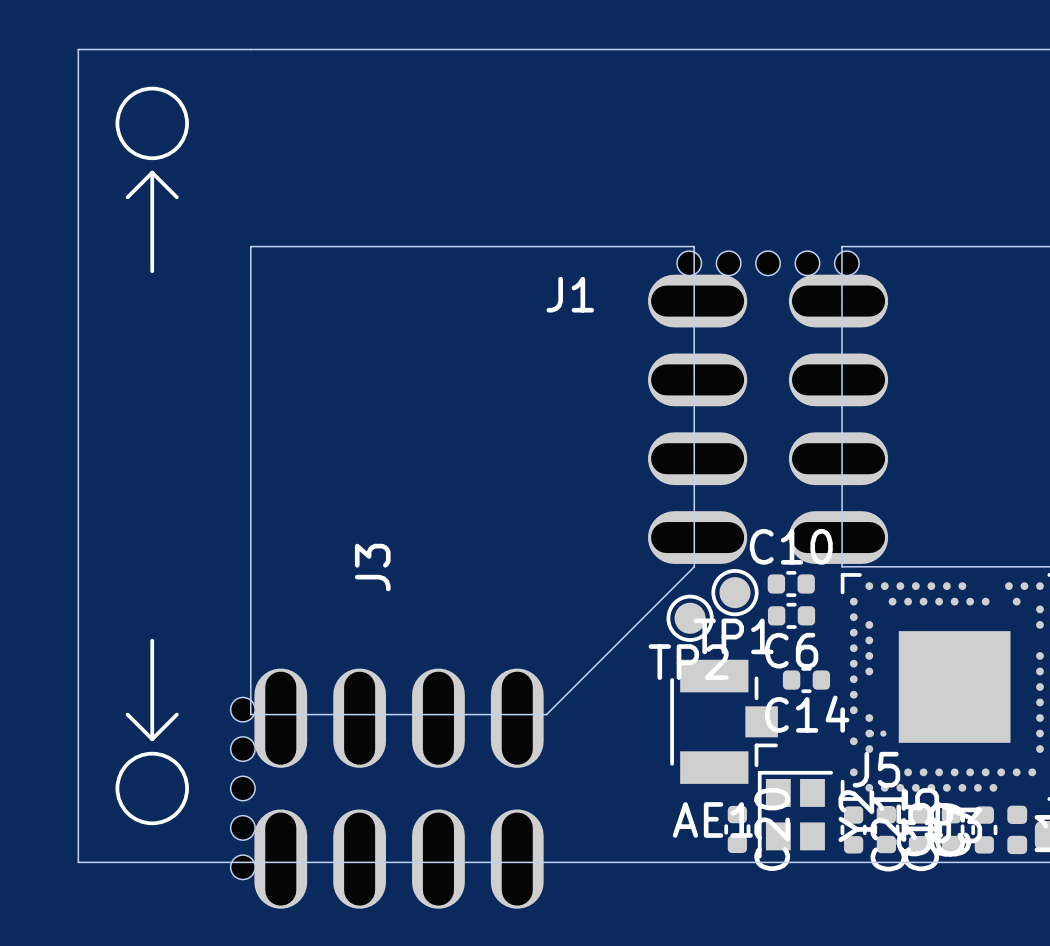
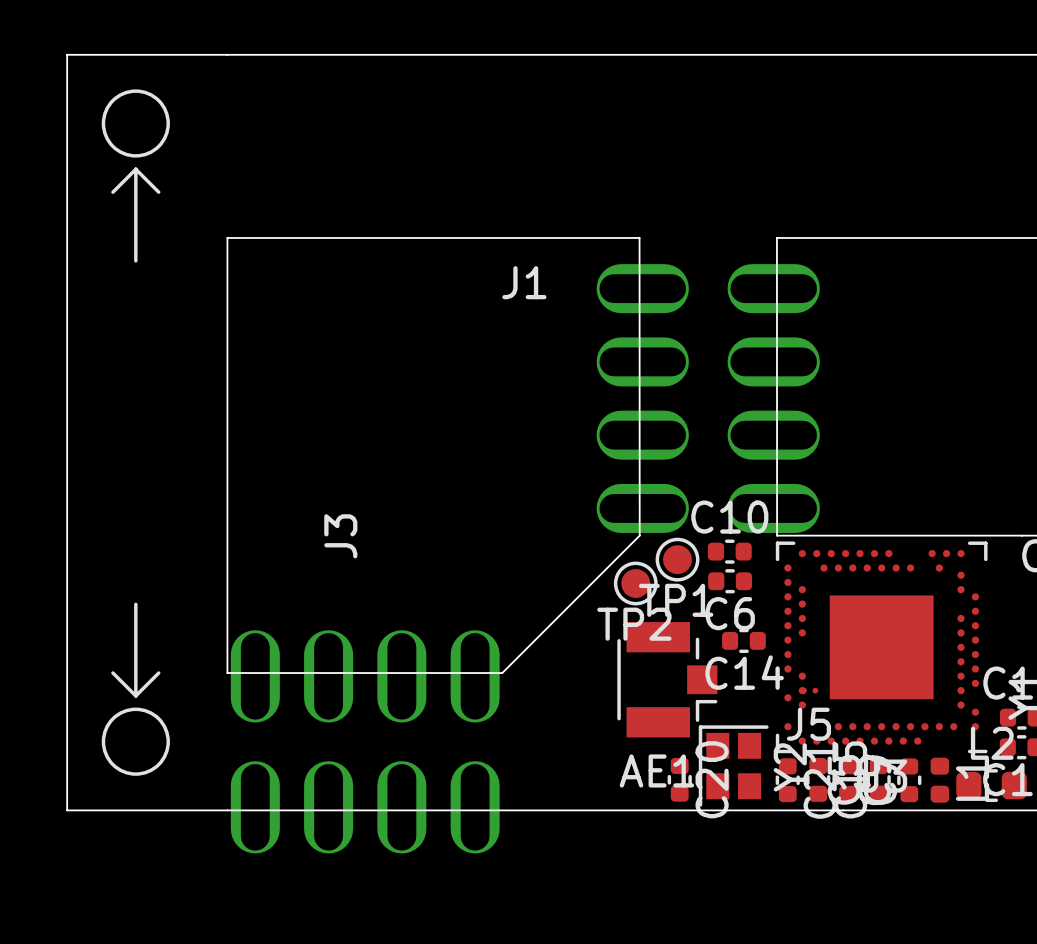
part: (768, 263) -> none
part: (242, 788) -> none

